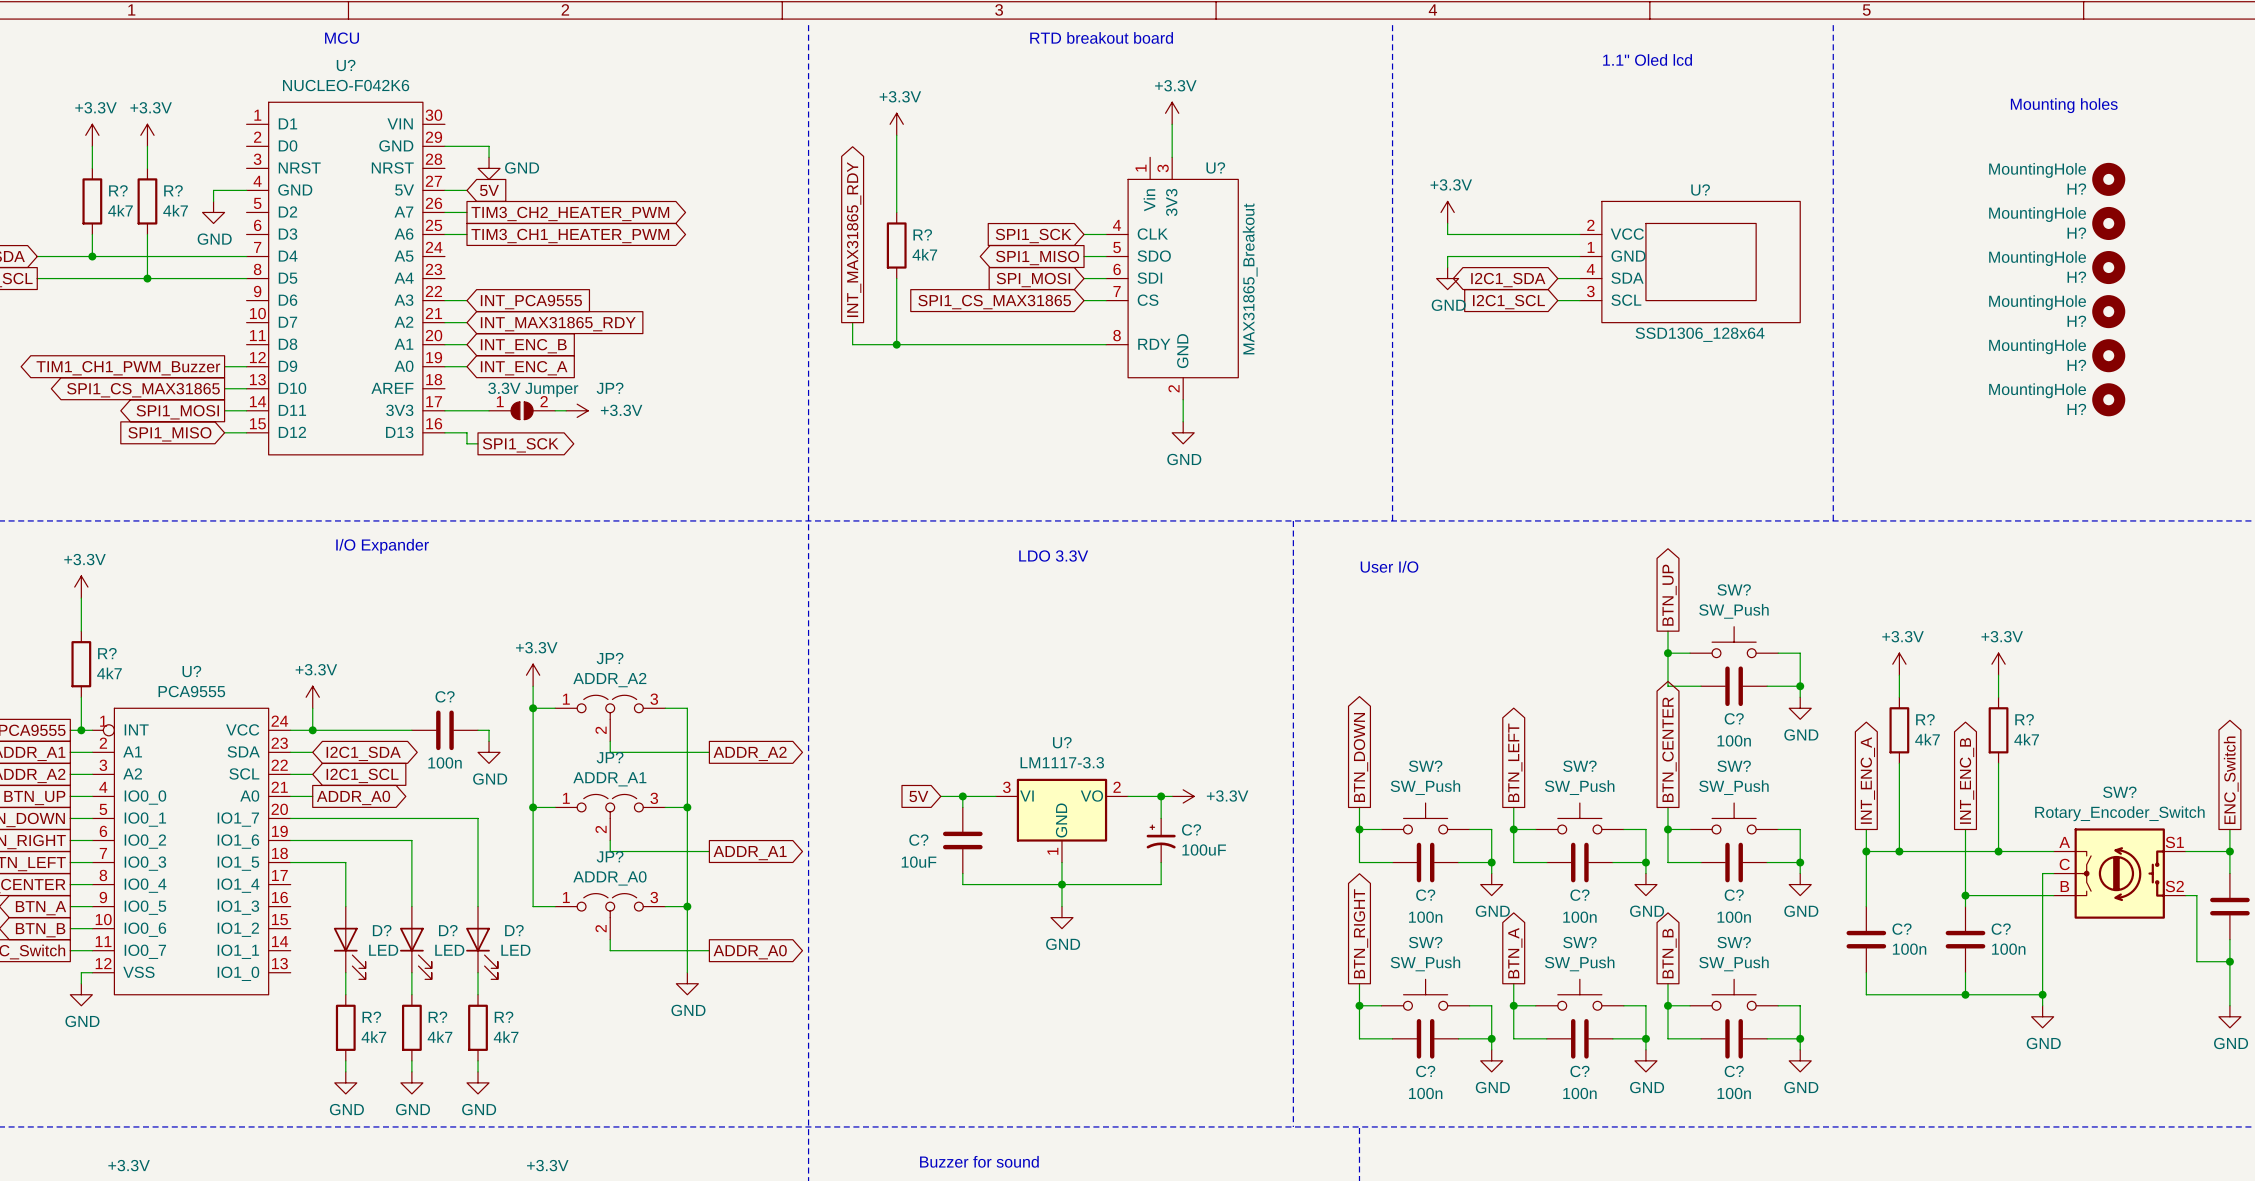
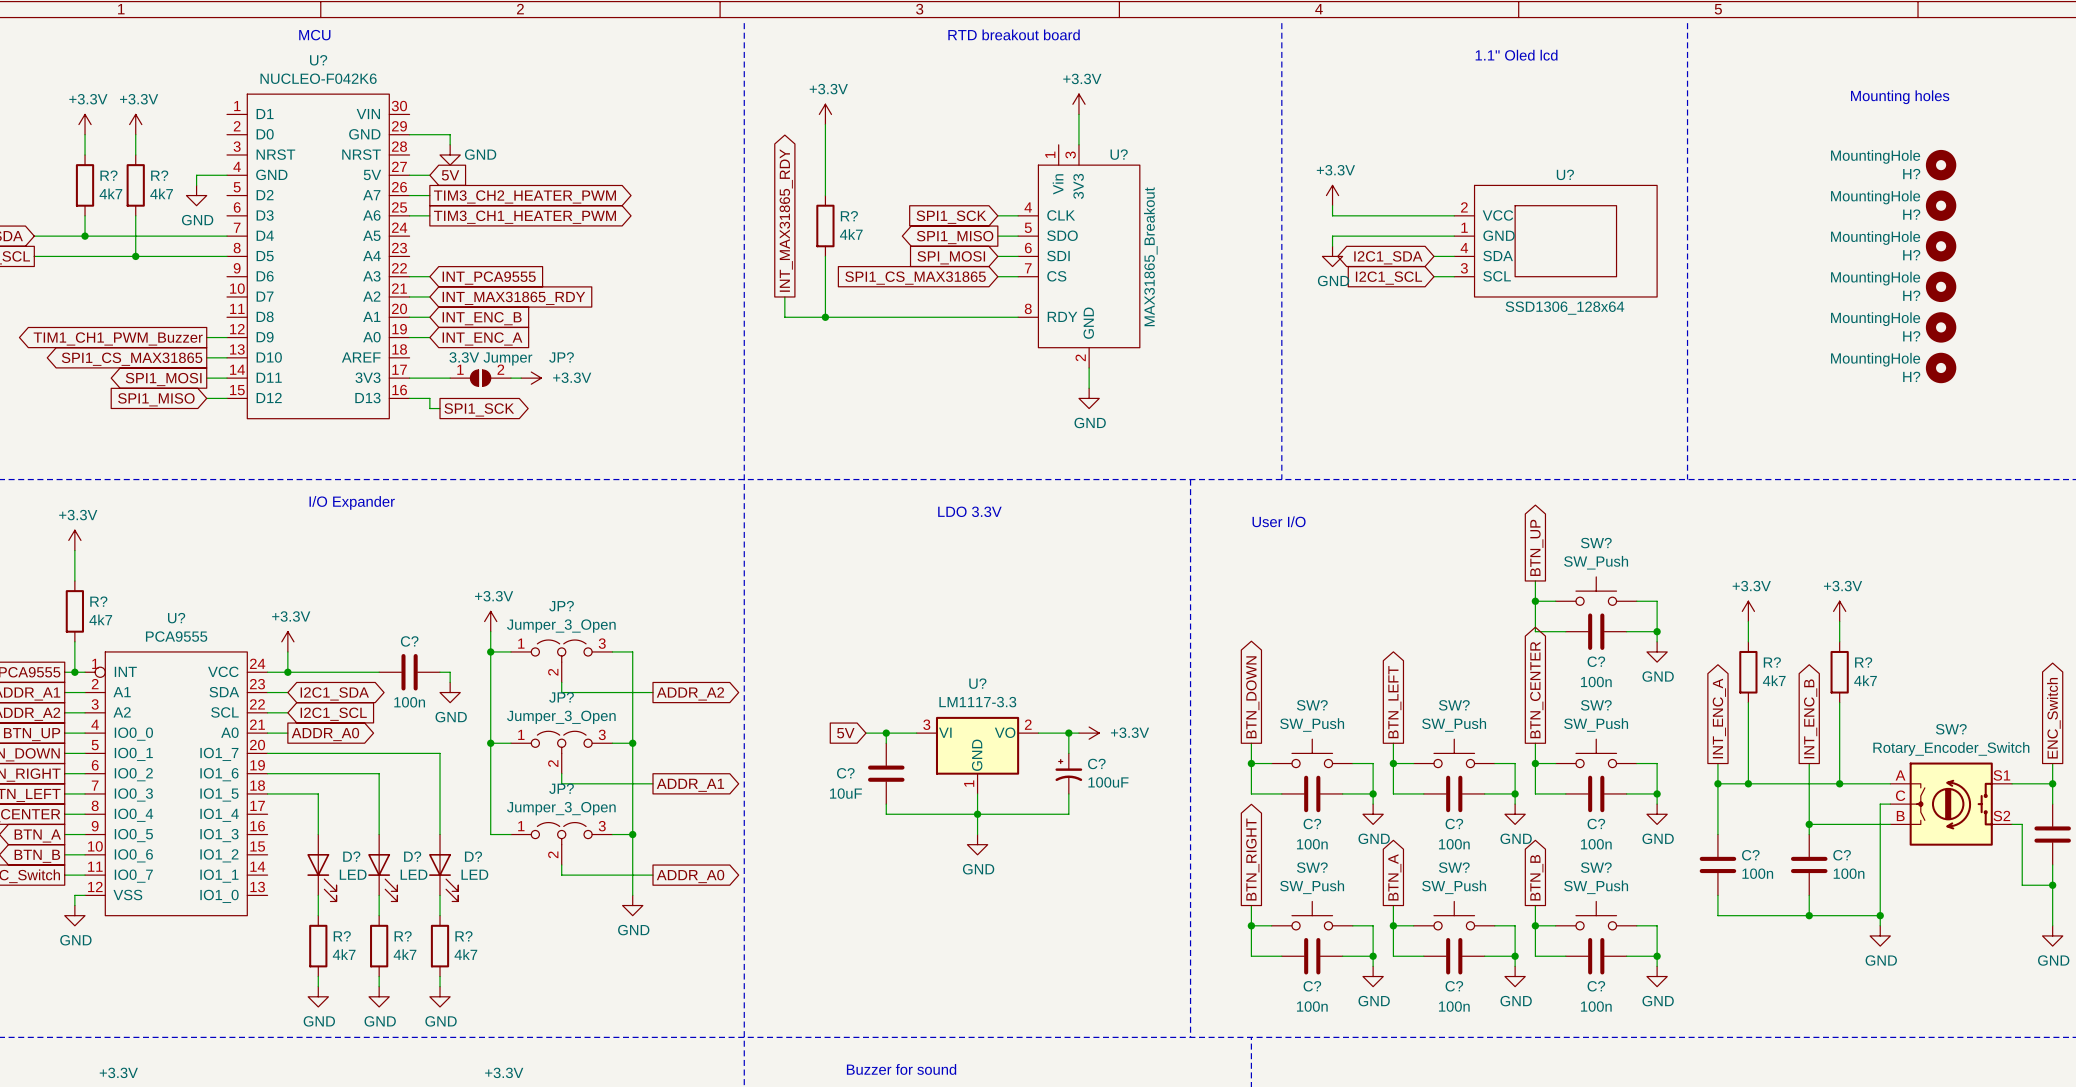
JP? value: ADDR_A2 (609, 680) -> Jumper_3_Open (561, 626)
JP? value: ADDR_A1 (609, 779) -> Jumper_3_Open (561, 717)
JP? value: ADDR_A0 (609, 878) -> Jumper_3_Open (561, 808)

